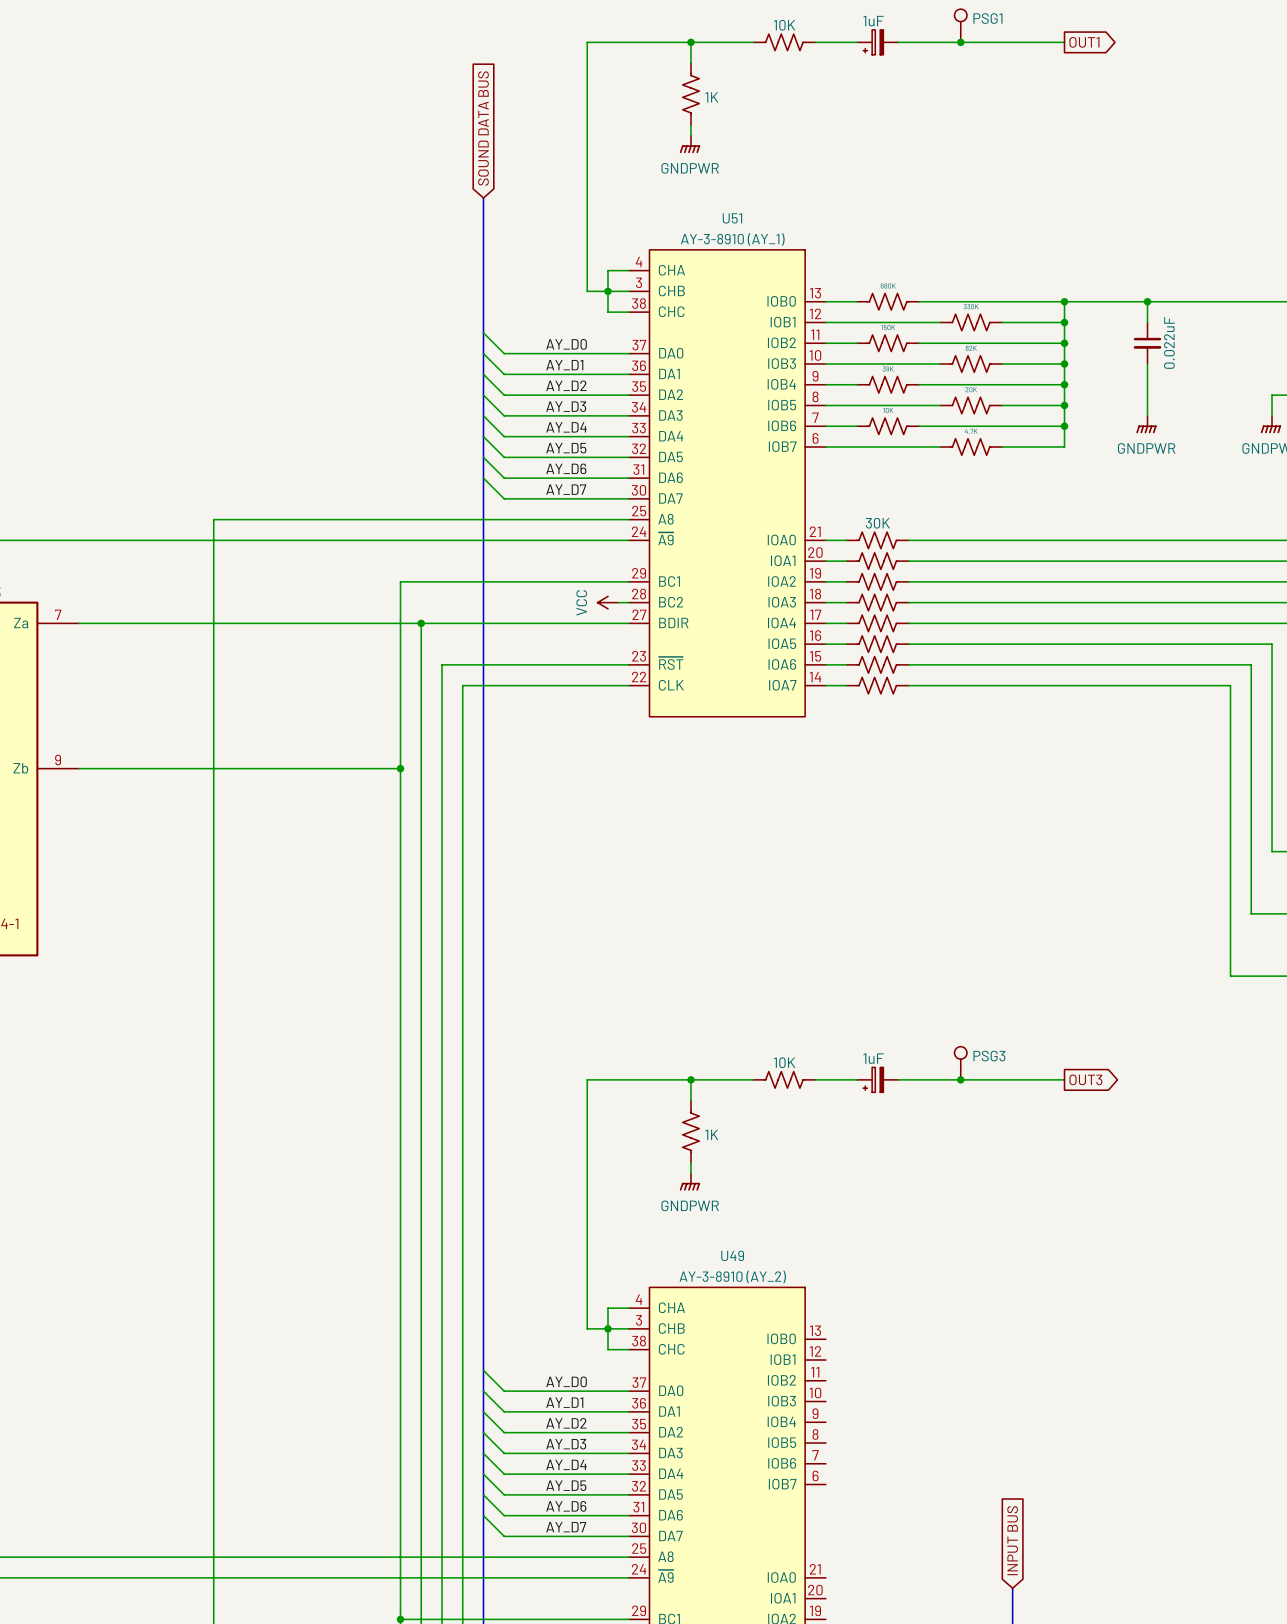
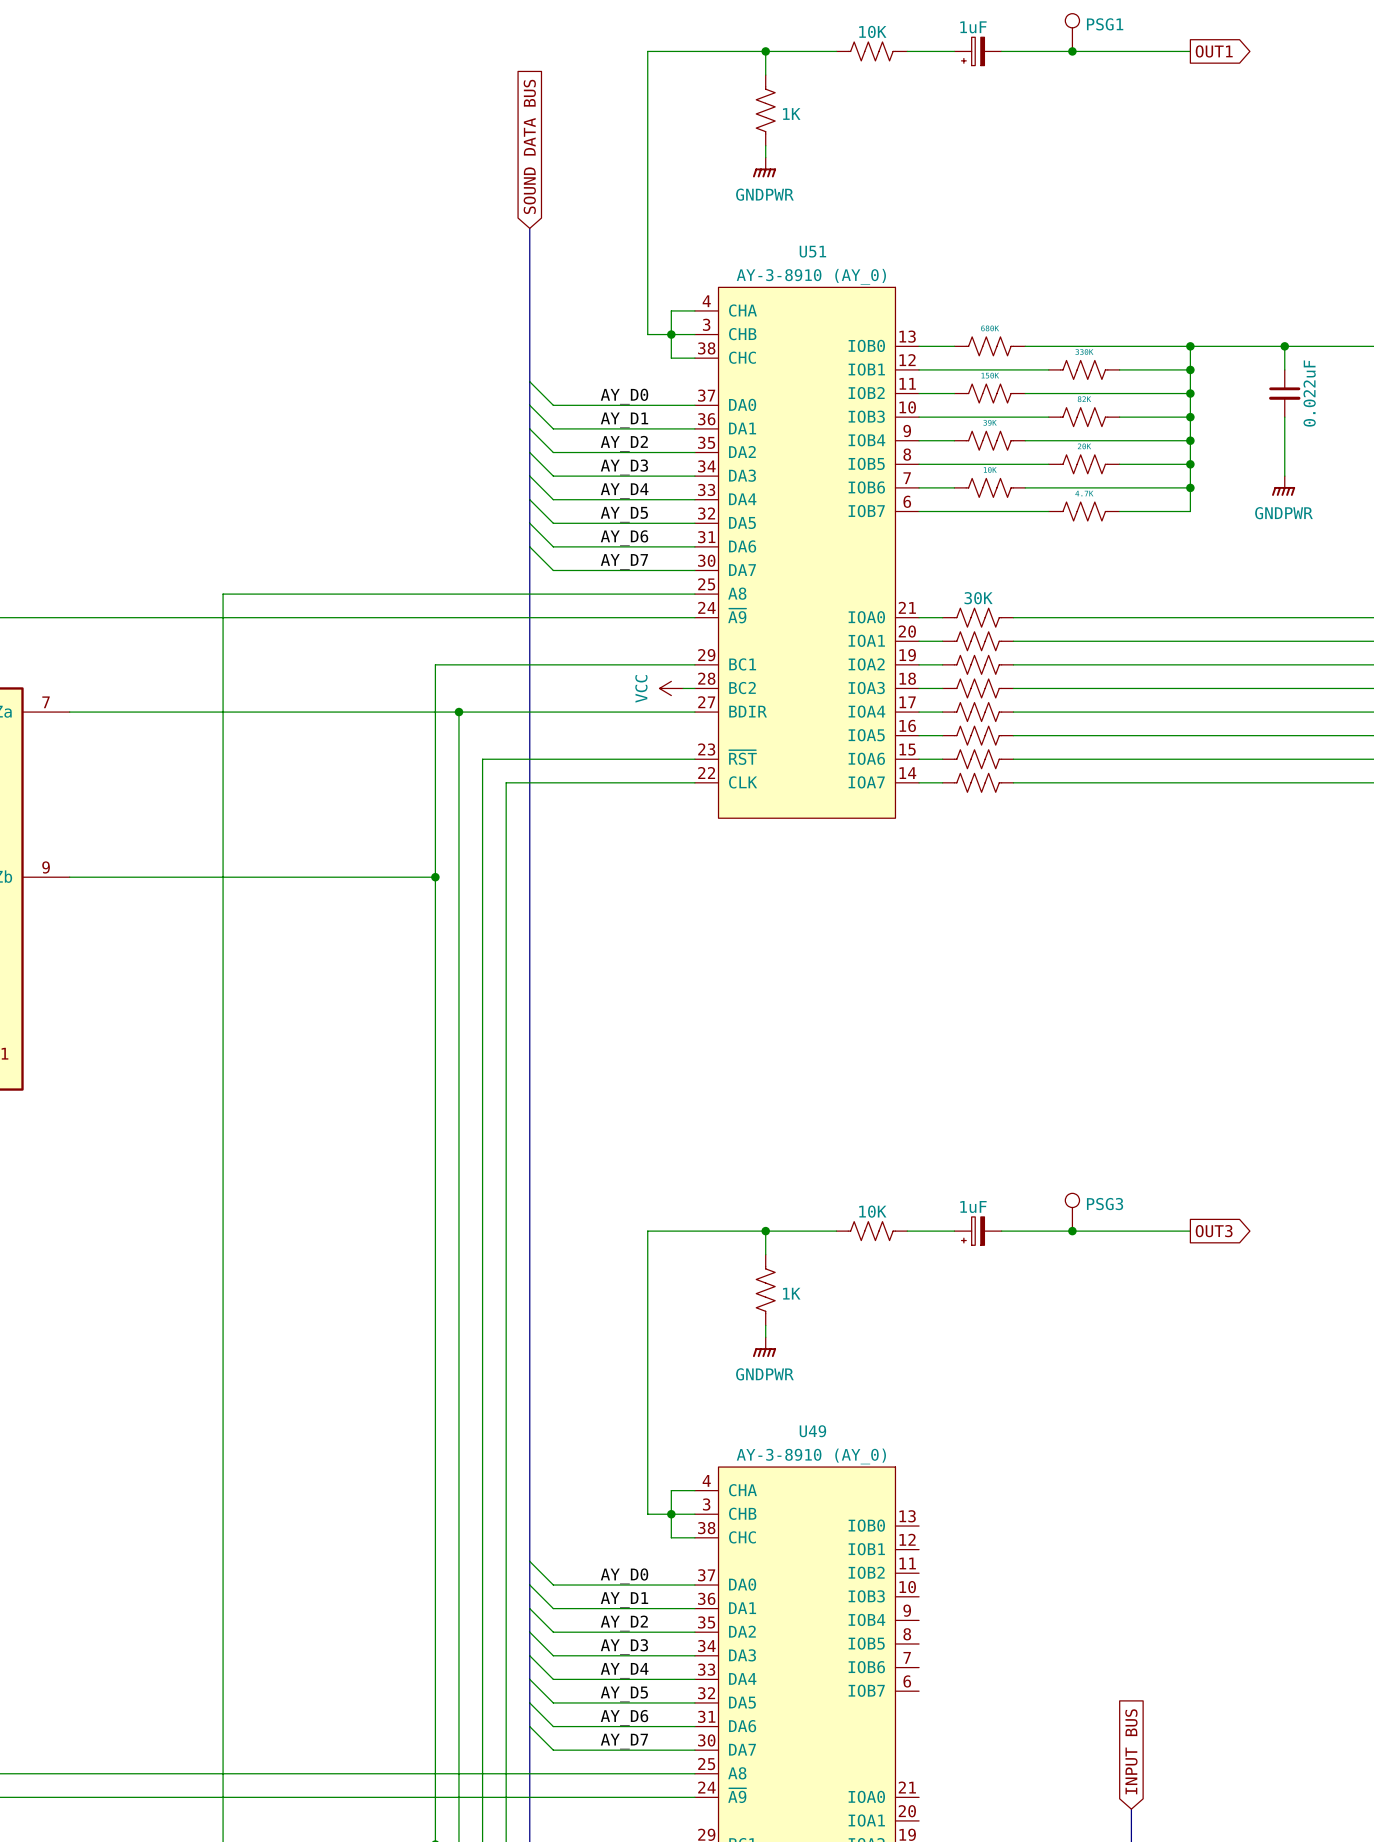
U51 value: AY-3-8910 (AY_1) (732, 239) -> AY-3-8910 (AY_0) (811, 276)
U49 value: AY-3-8910 (AY_2) (732, 1276) -> AY-3-8910 (AY_0) (811, 1456)

